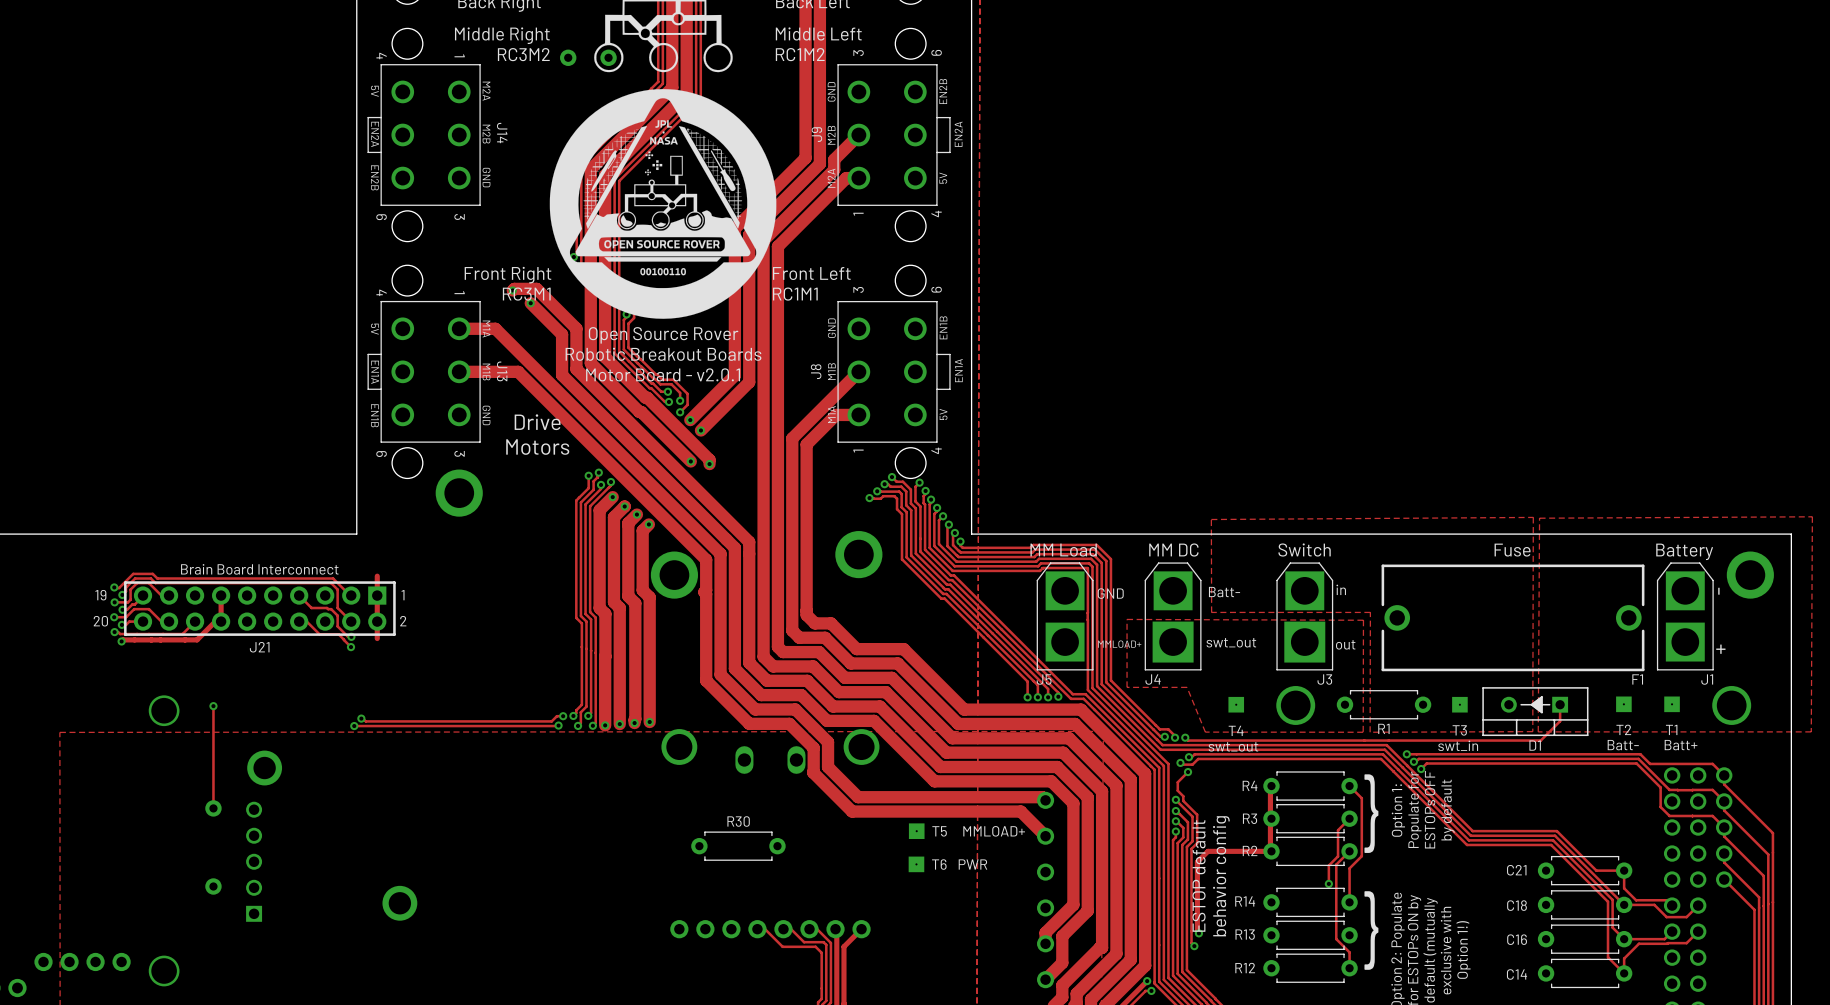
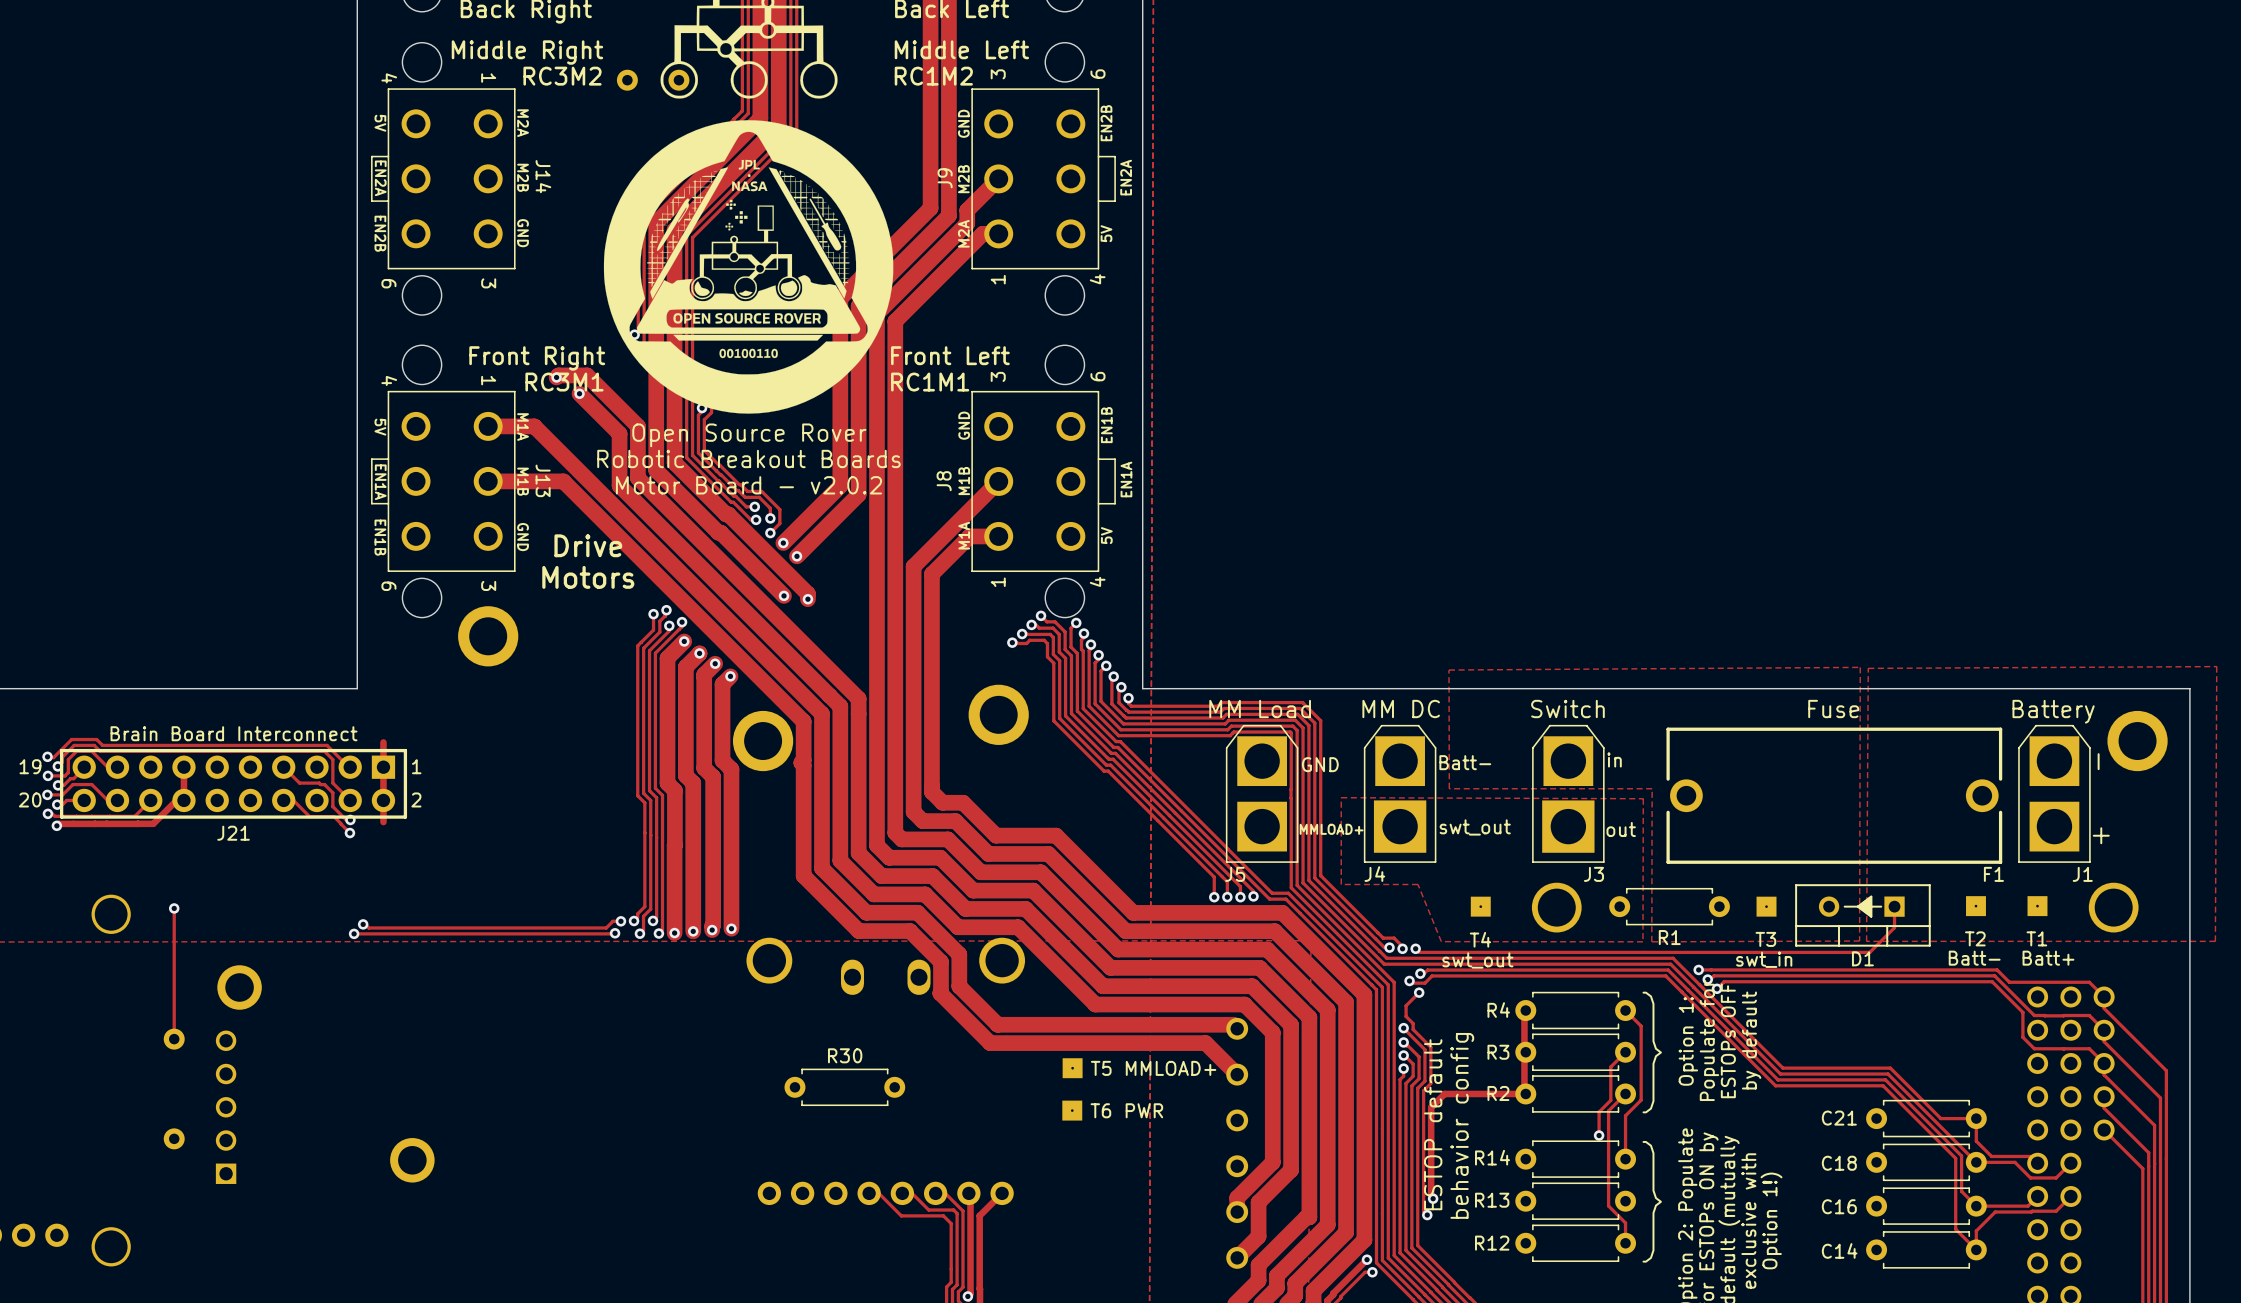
text: Motor Board - v2.0.1 (663, 374) -> Motor Board - v2.0.2 (748, 485)

